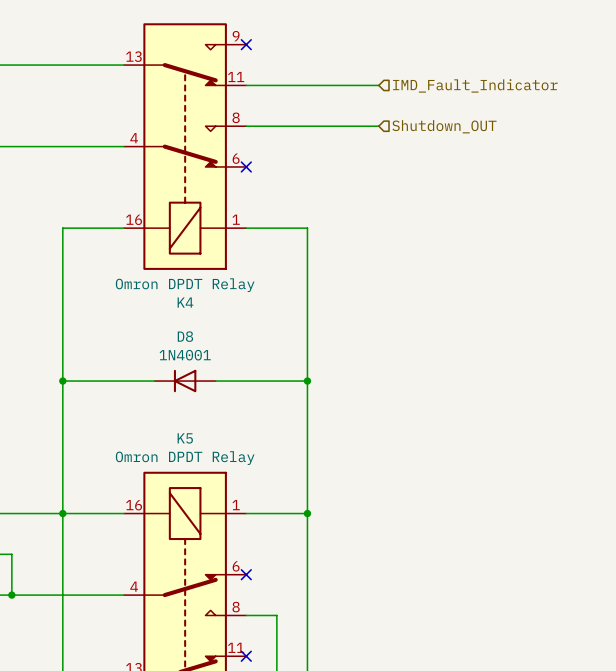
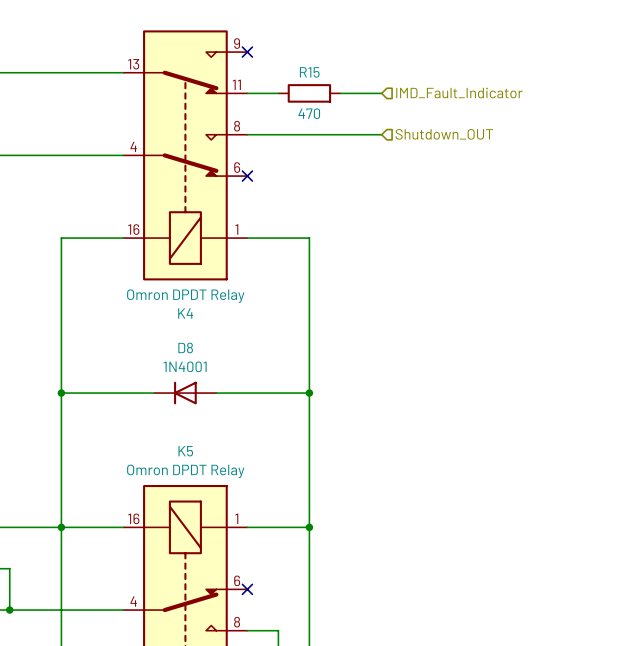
wire: (276, 85) (338, 85) -> none
R15: none -> 470 (309, 93)

